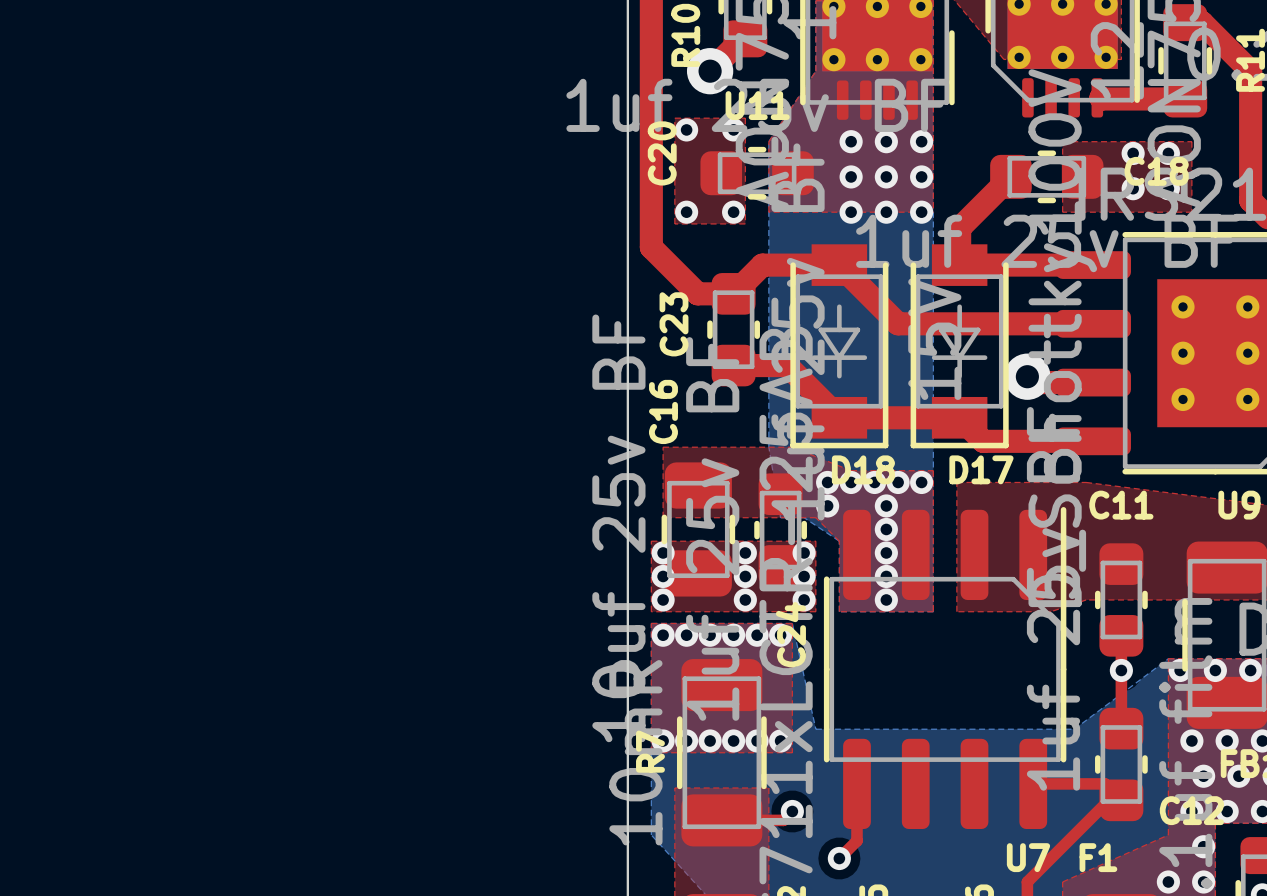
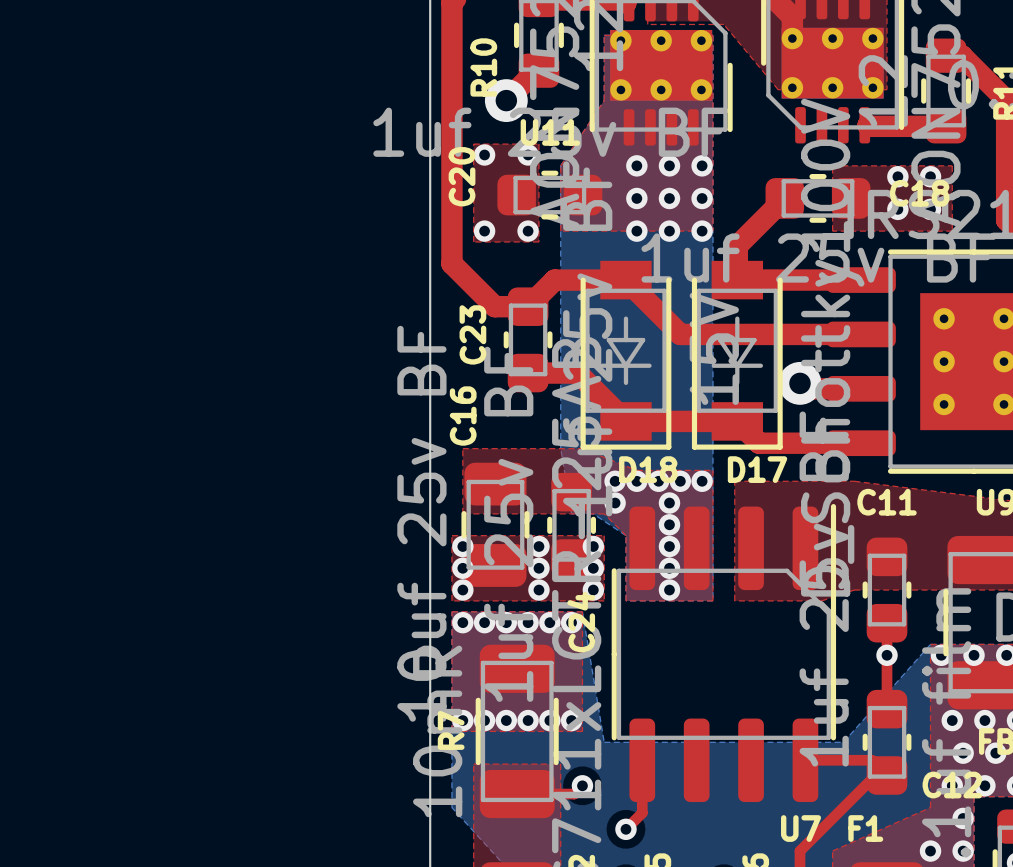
bottom zone outline: (792, 623) (815, 729) (1074, 729) (1168, 658) -> (582, 611) (604, 742) (843, 742) (930, 644)

